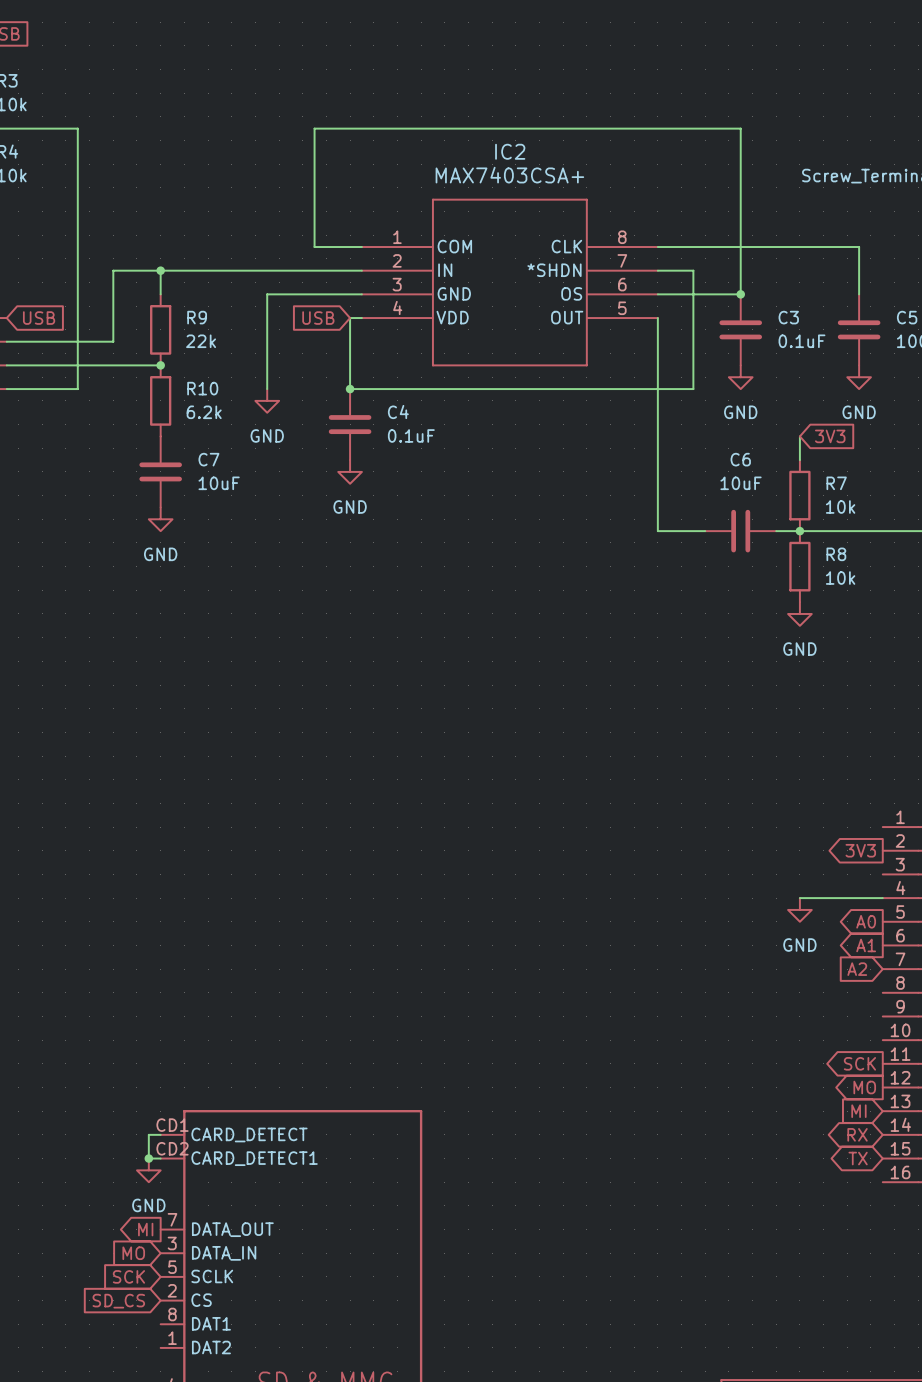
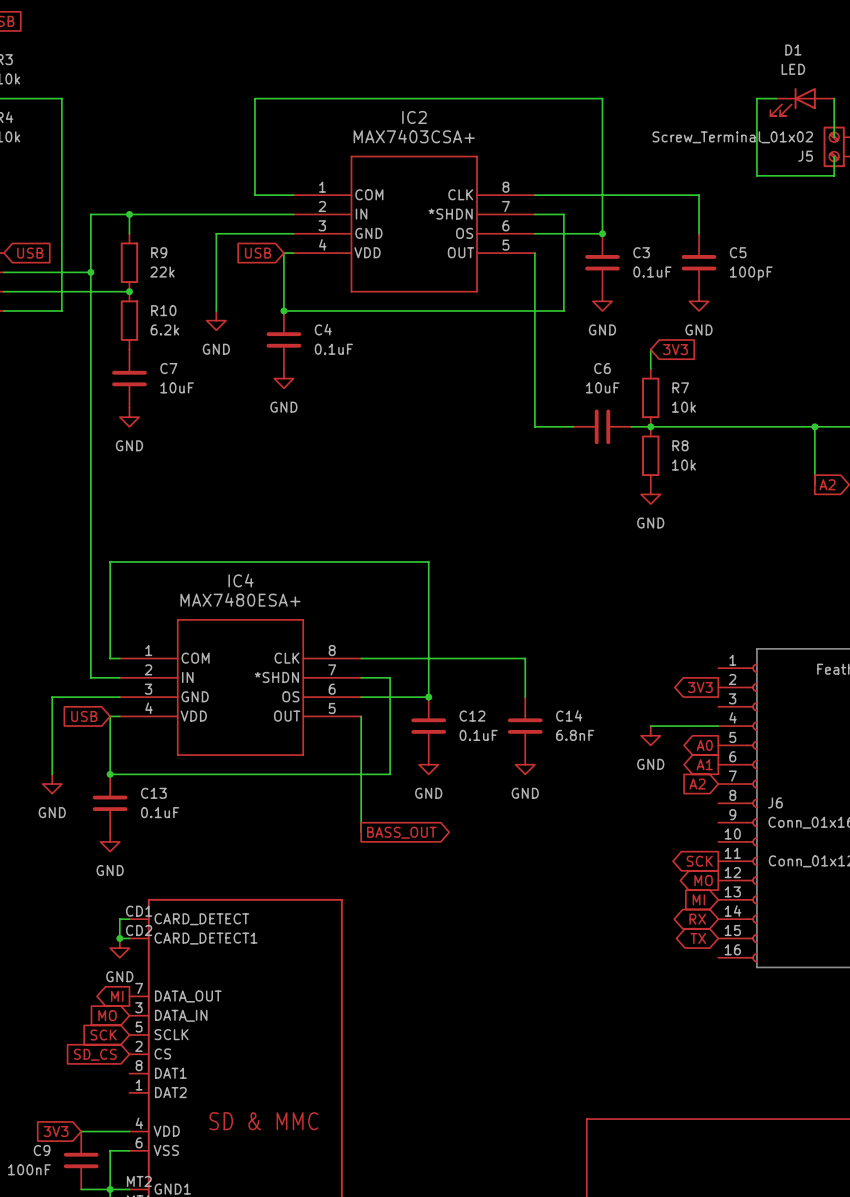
wire: none -> (90, 272) (90, 677) (119, 677)
junction: none -> (90, 272)
wire: none -> (119, 658) (110, 658) (110, 561) (428, 561) (428, 697) (361, 697)
wire: none -> (361, 658) (525, 658) (525, 697)
wire: none -> (361, 677) (390, 677) (390, 774) (110, 774) (110, 716) (119, 716)
IC4: none -> MAX7480ESA+ (240, 687)
wire: none -> (119, 697) (52, 697) (52, 774)
junction: none -> (428, 697)
global label: none -> USB (84, 716)
wire: none -> (361, 716) (361, 832)
C12: none -> 0.1uF (428, 726)
C14: none -> 6.8nF (525, 726)
power symbol: none -> GND (428, 764)
power symbol: none -> GND (525, 764)
junction: none -> (110, 774)
power symbol: none -> GND (52, 784)
C13: none -> 0.1uF (110, 803)
global label: none -> BASS_OUT (401, 832)
power symbol: none -> GND (110, 841)

